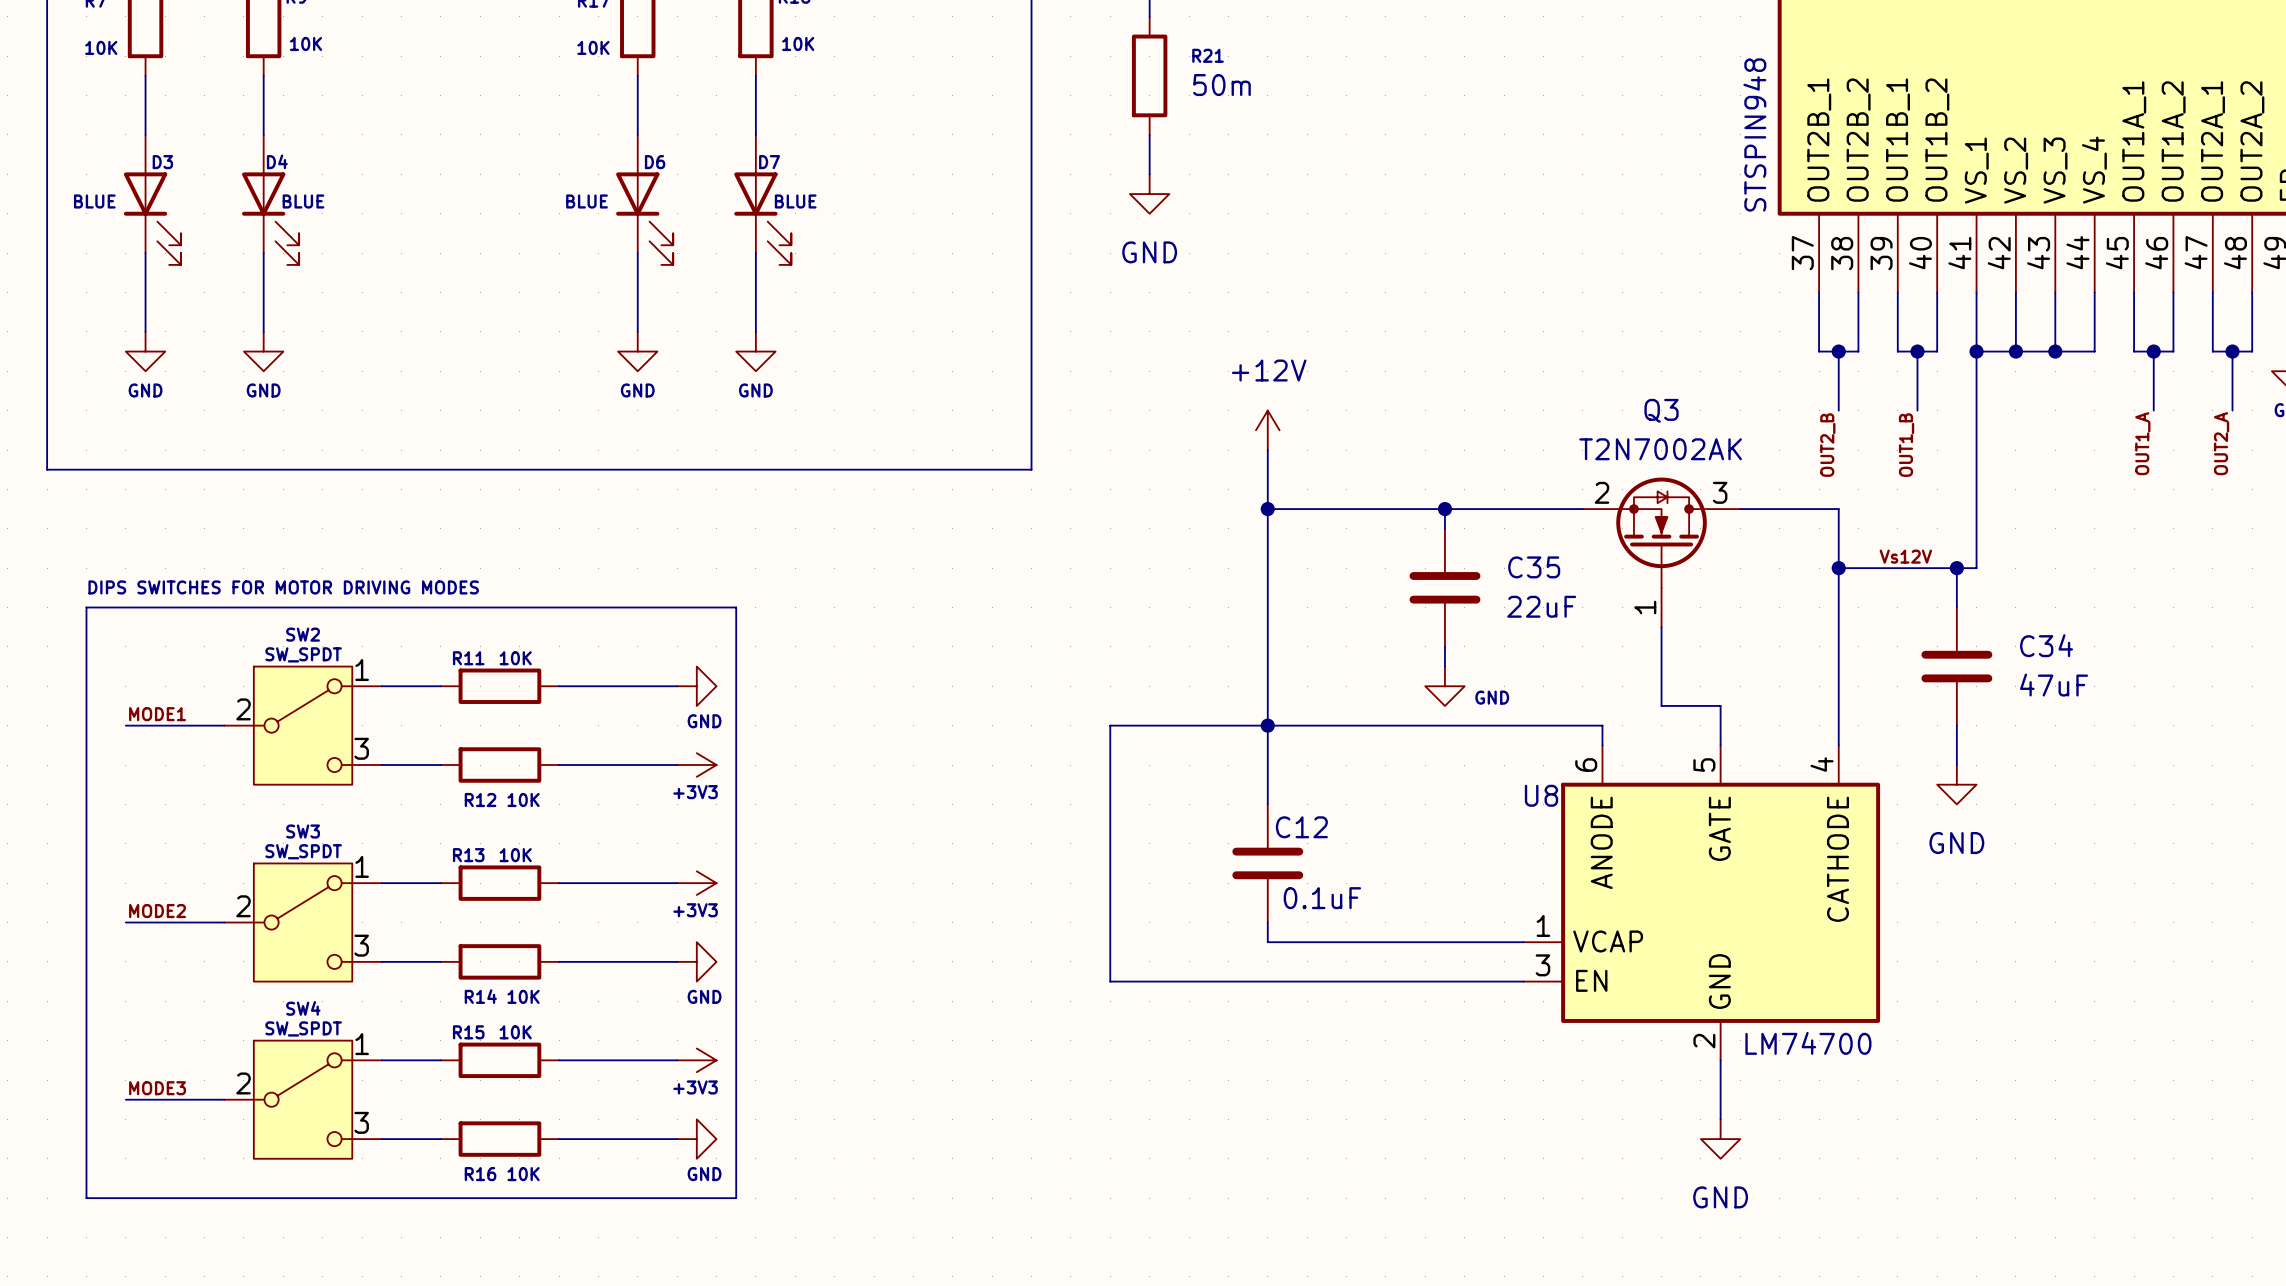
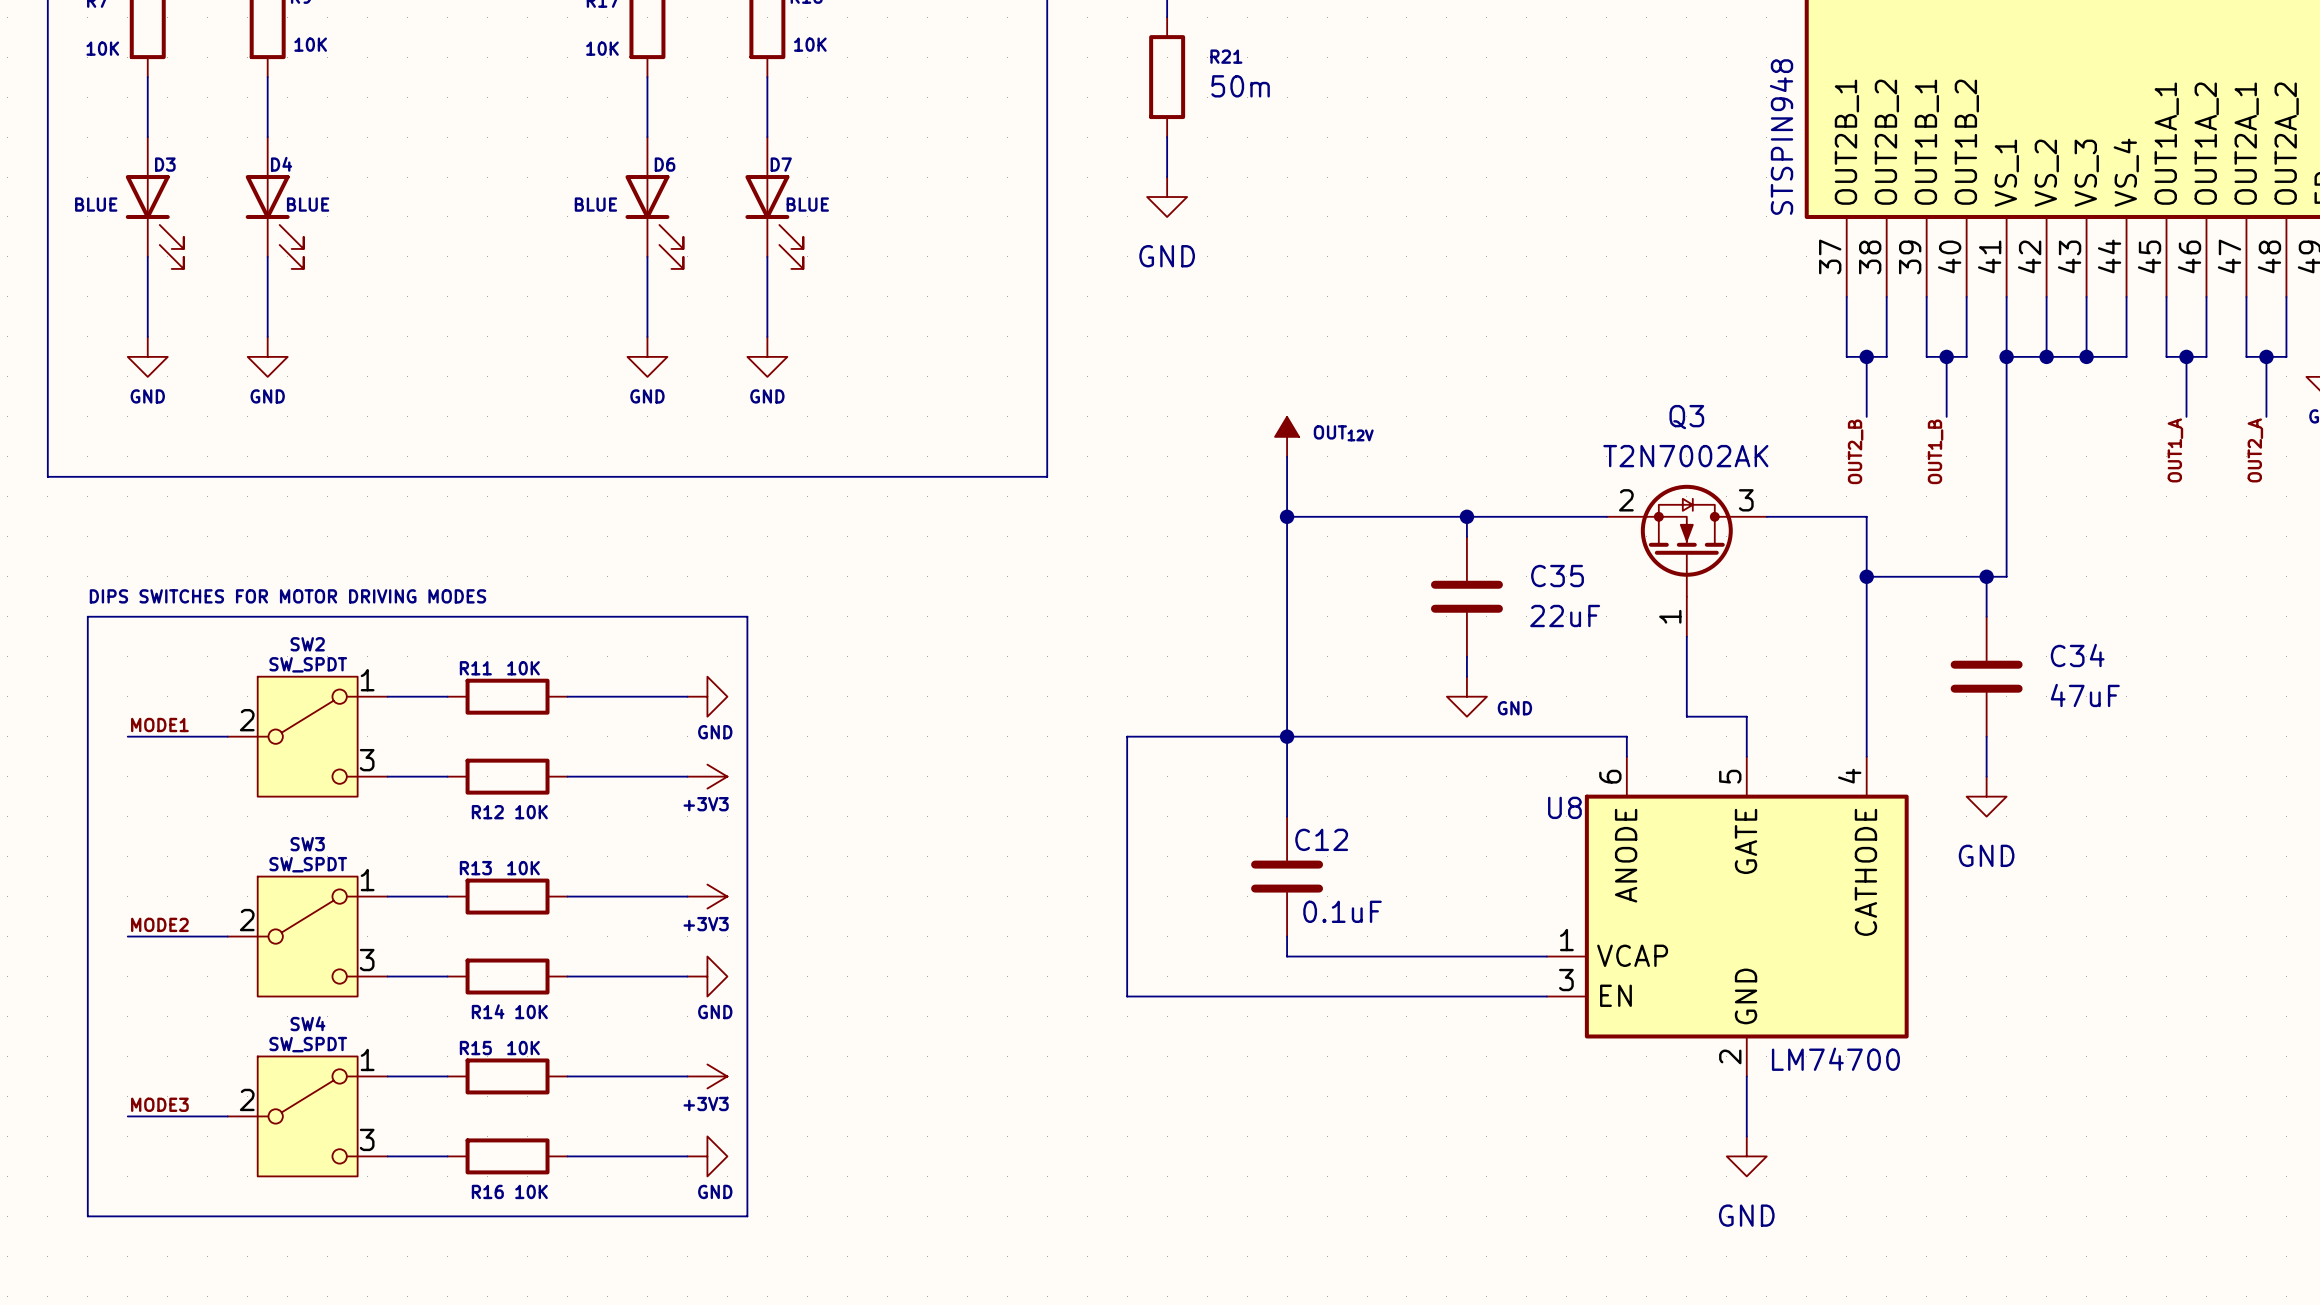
power symbol: +12V (1267, 430) -> OUT12V (1287, 436)
label: Vs12V (1905, 556) -> none

